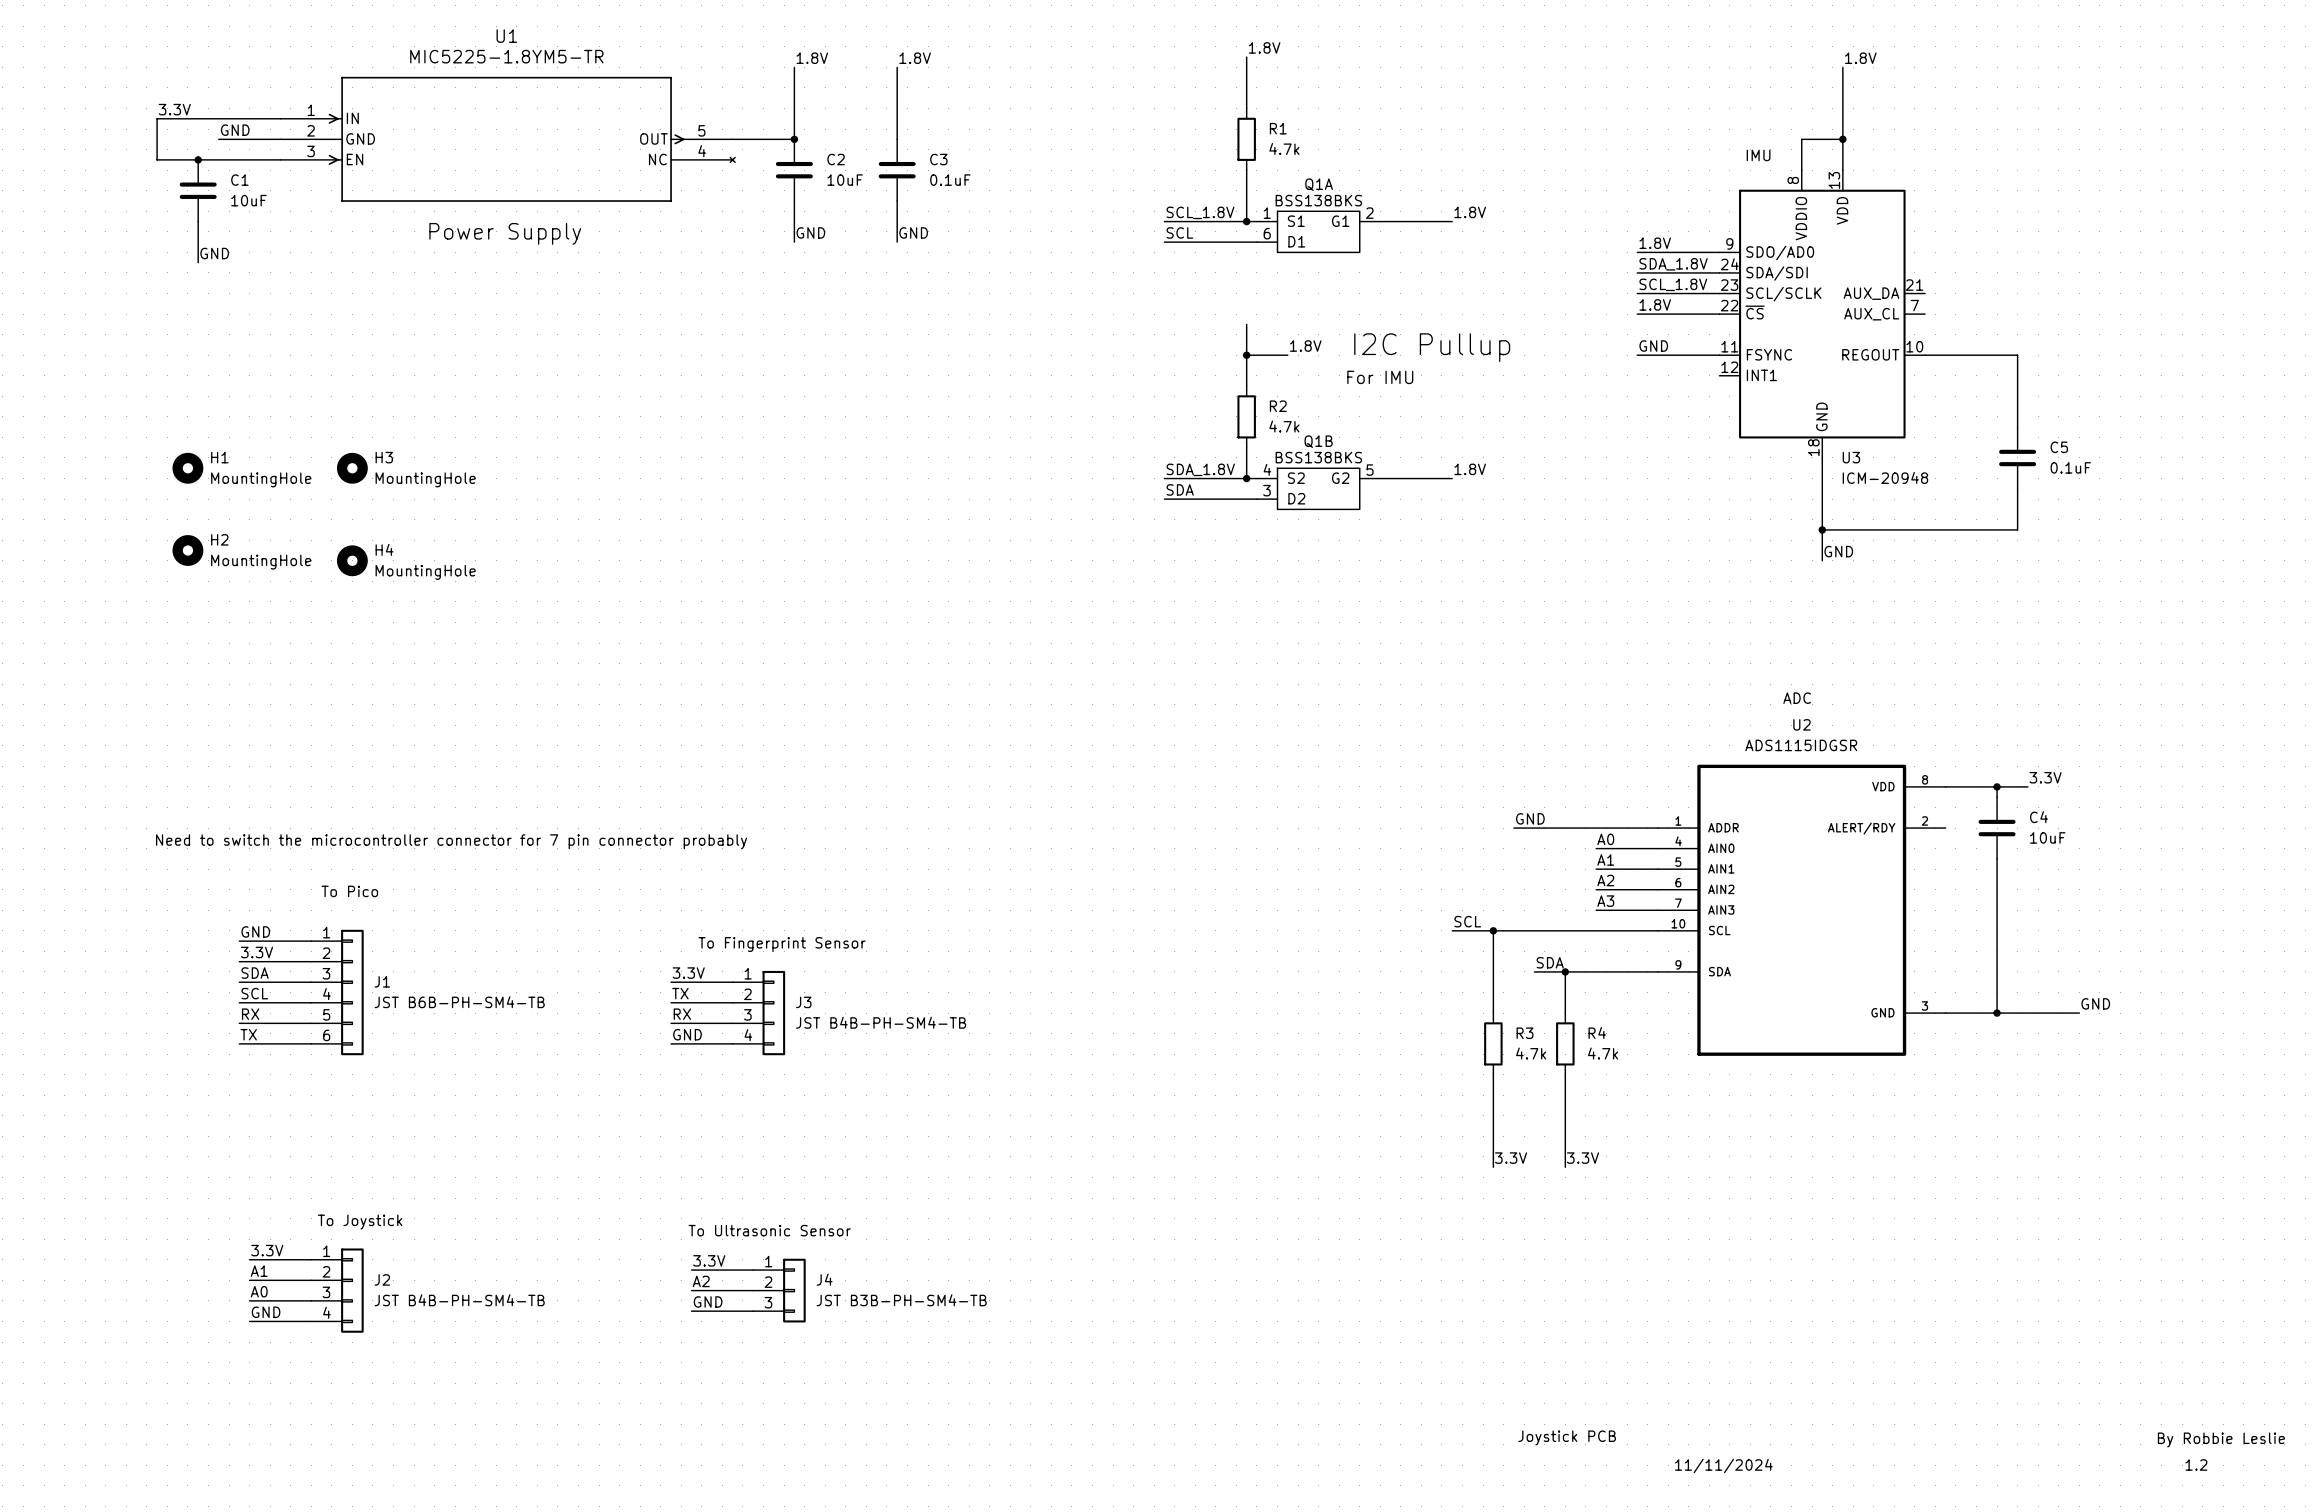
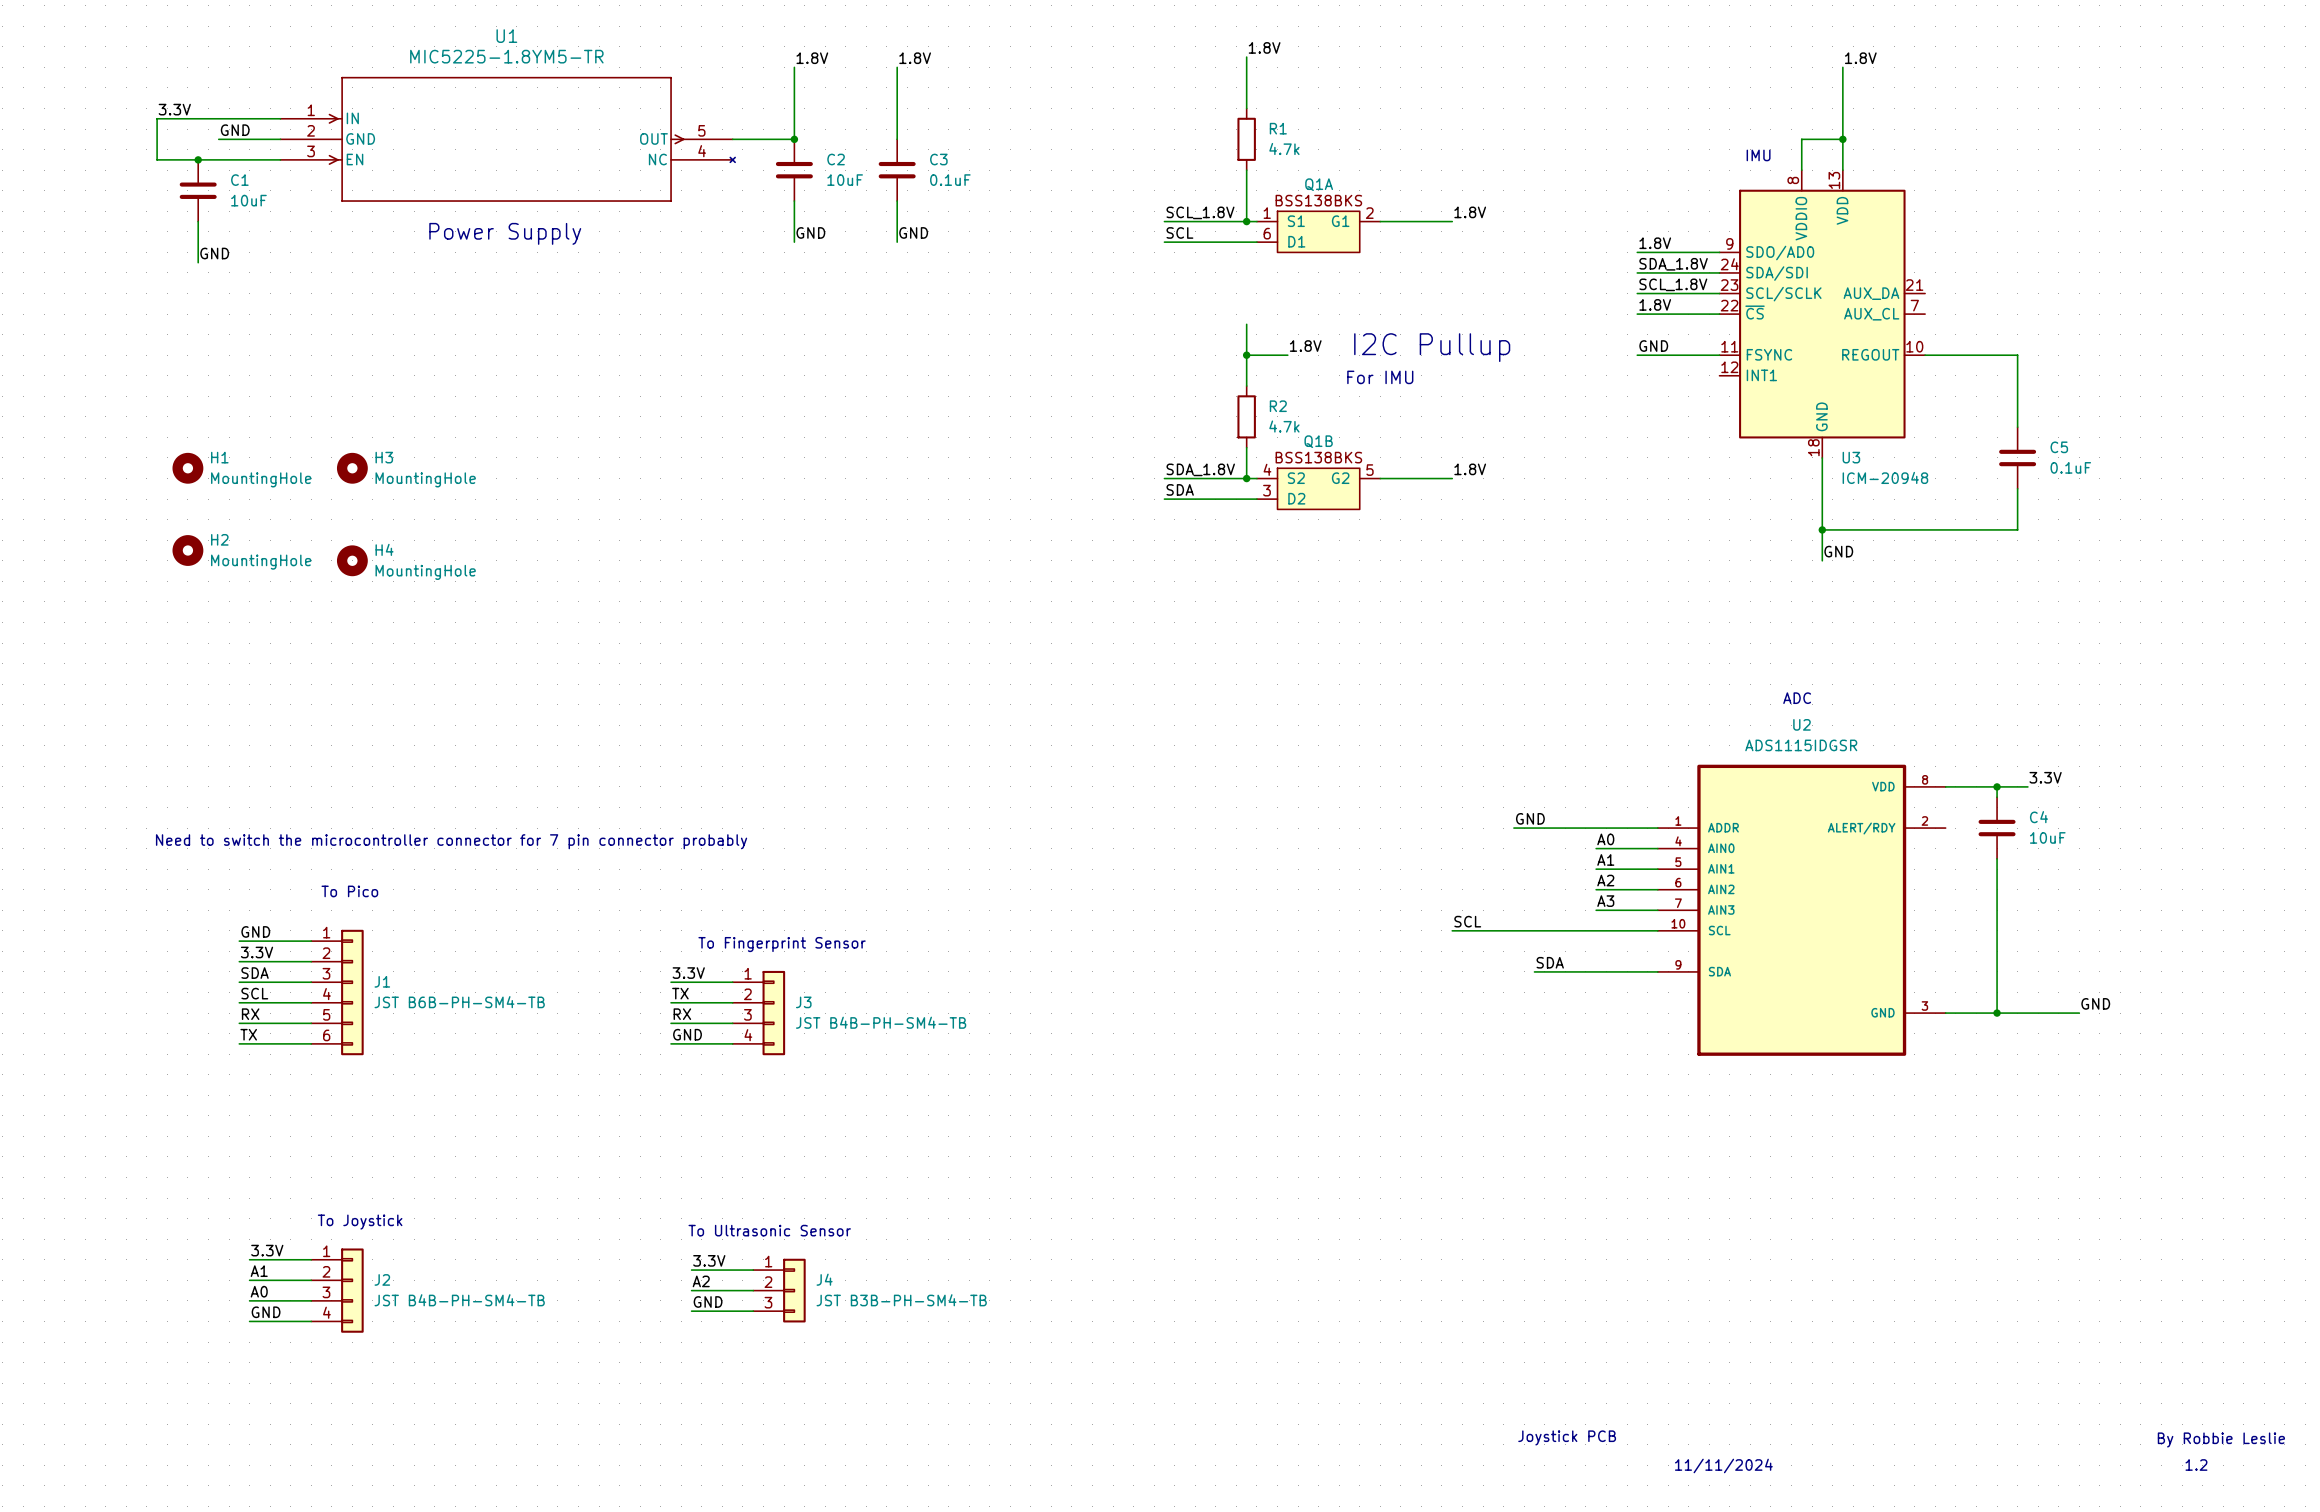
wire: (1493, 930) (1493, 1013) -> none
junction: (1493, 930) -> none
wire: (1565, 971) (1565, 1013) -> none
junction: (1565, 971) -> none
R3: 4.7k (1493, 1043) -> none
R4: 4.7k (1565, 1043) -> none
wire: (1493, 1074) (1493, 1167) -> none
wire: (1565, 1074) (1565, 1167) -> none
label: 3.3V (1511, 1158) -> none
label: 3.3V (1583, 1158) -> none

